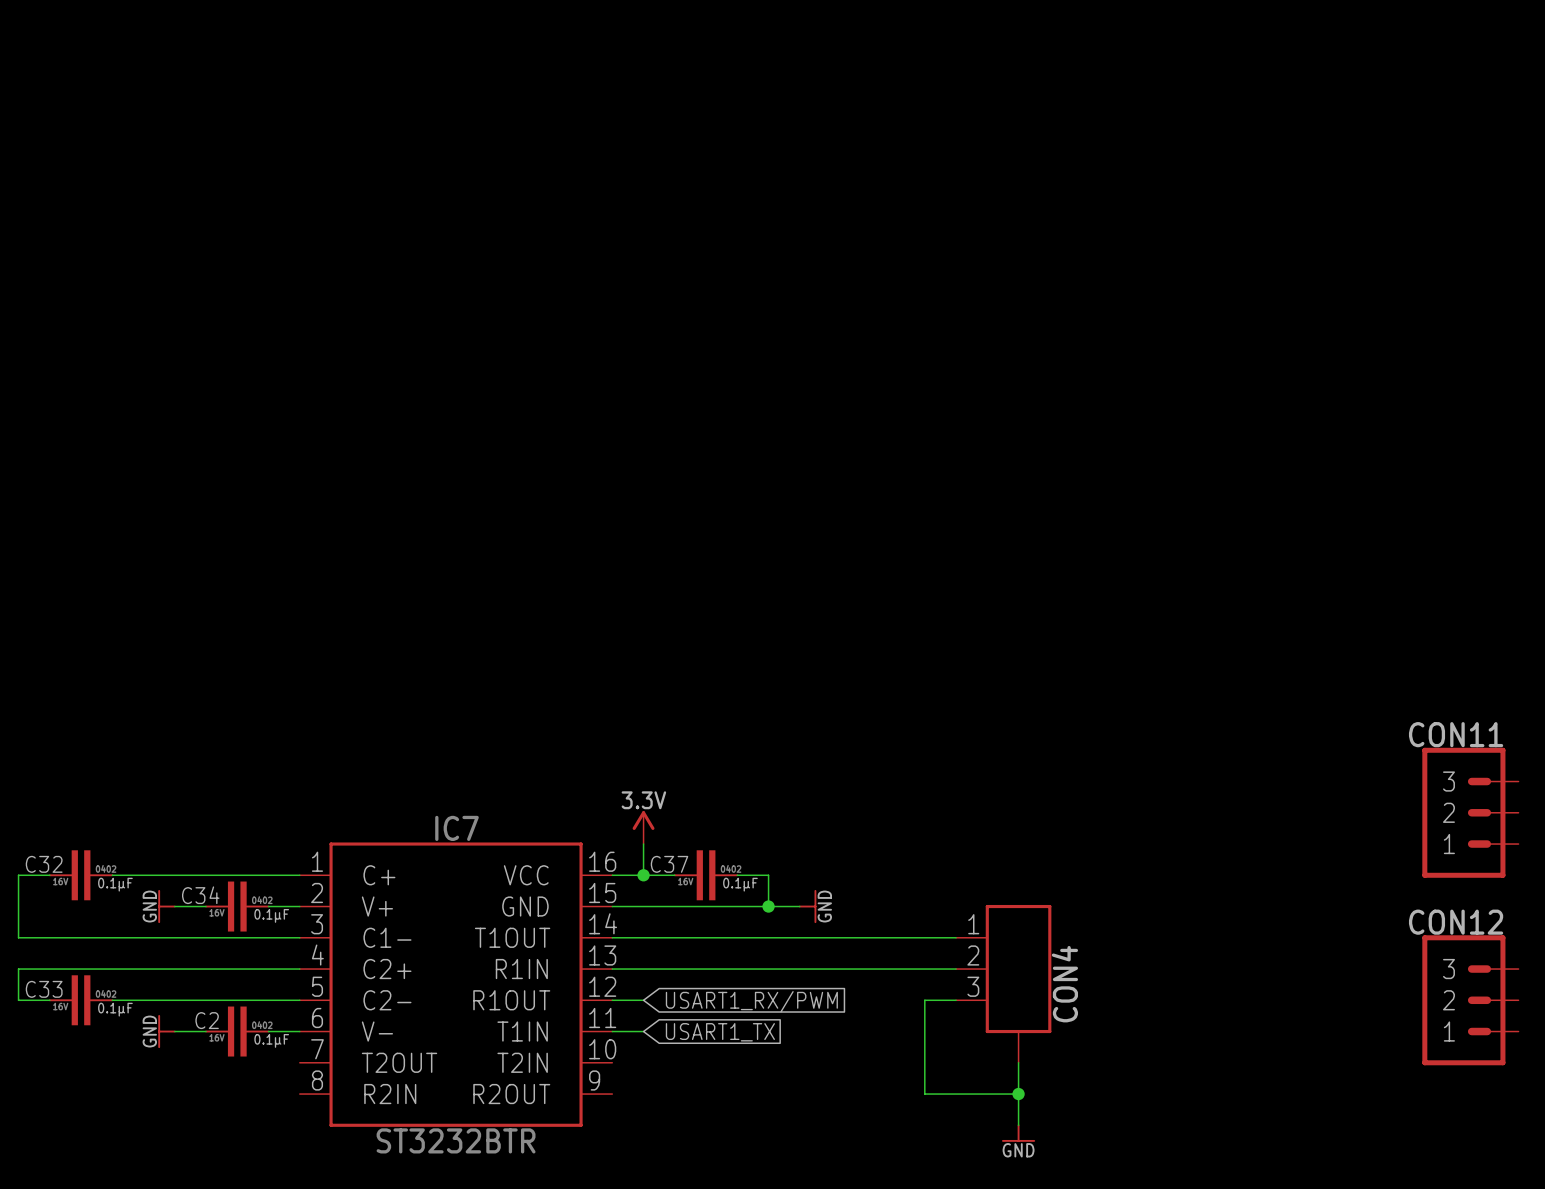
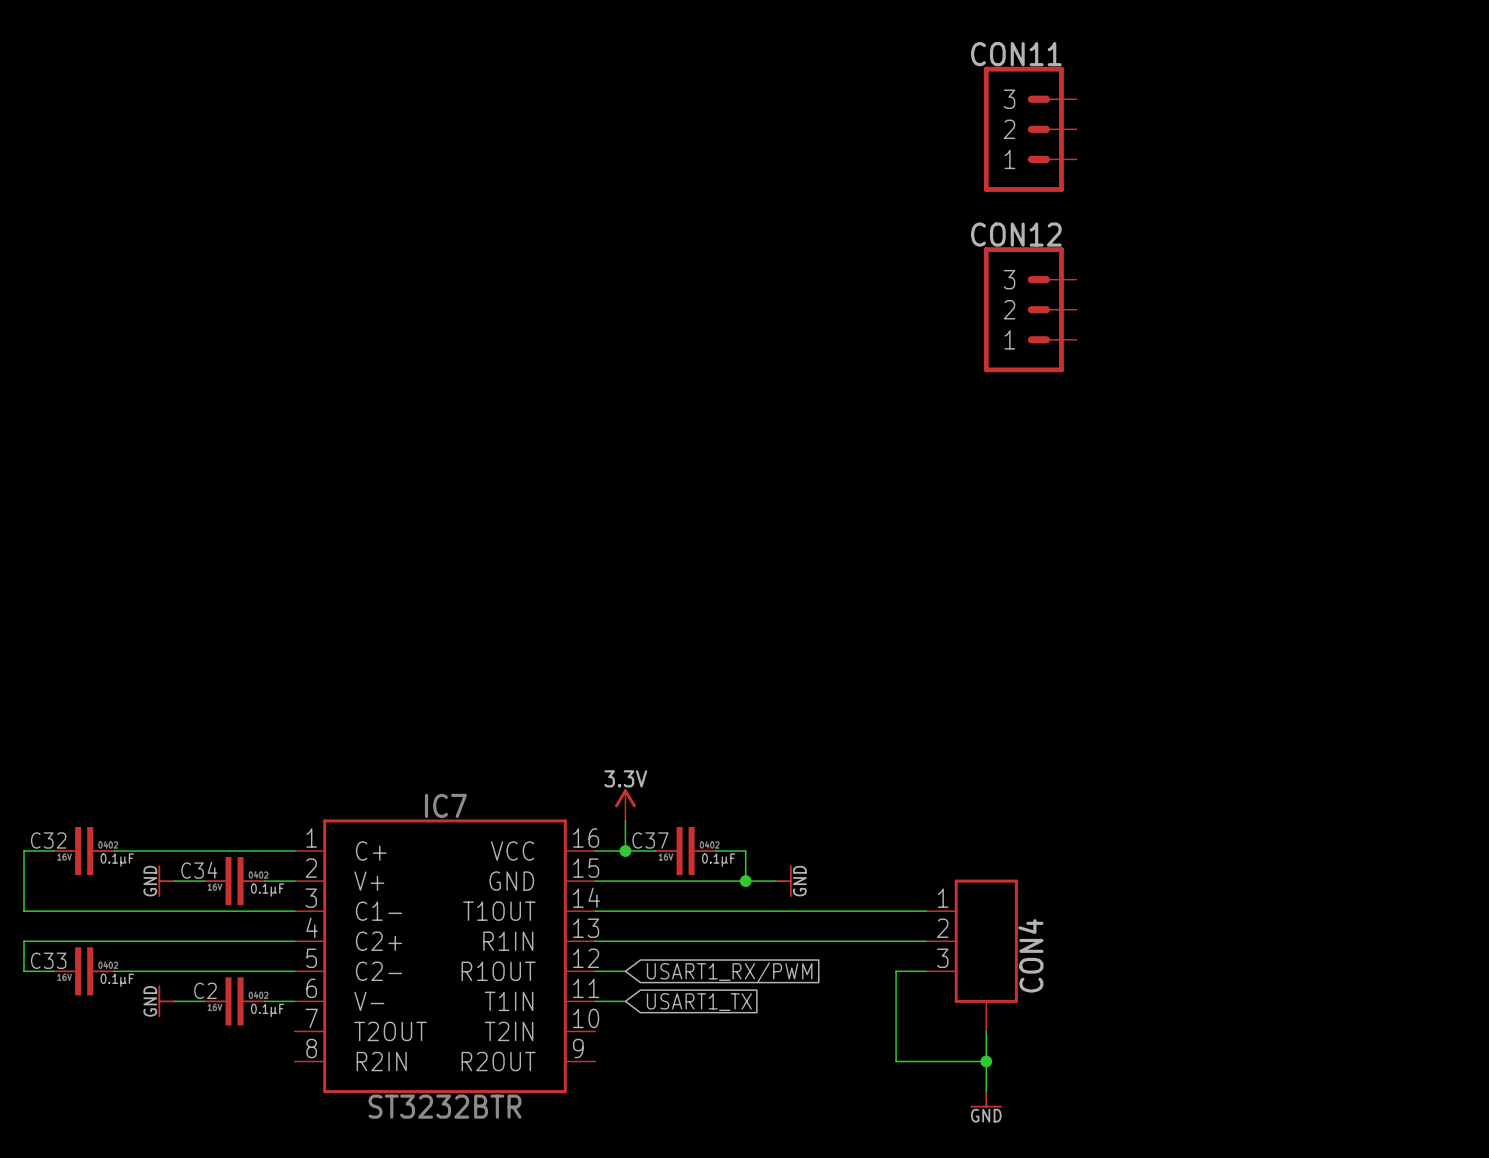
CON11 position: (1470, 812) -> (1030, 129)
CON12 position: (1470, 1000) -> (1030, 309)

